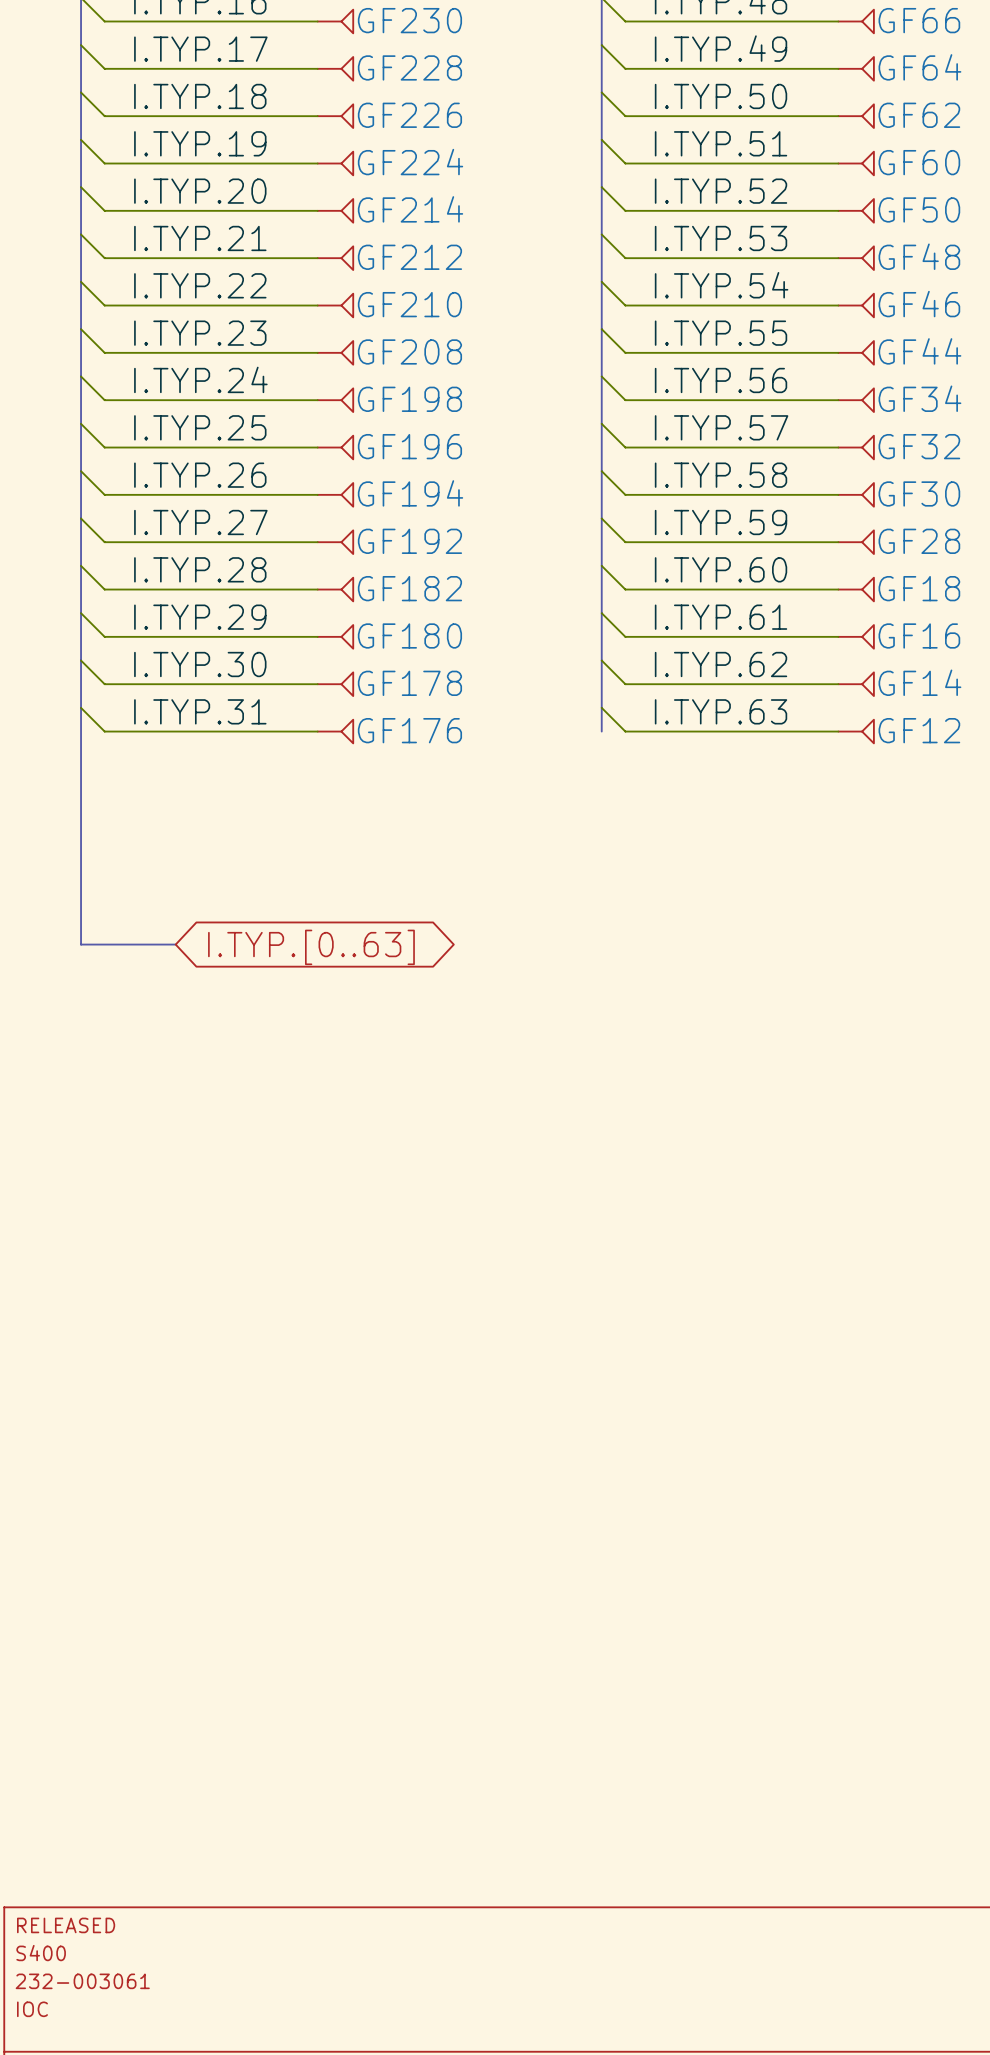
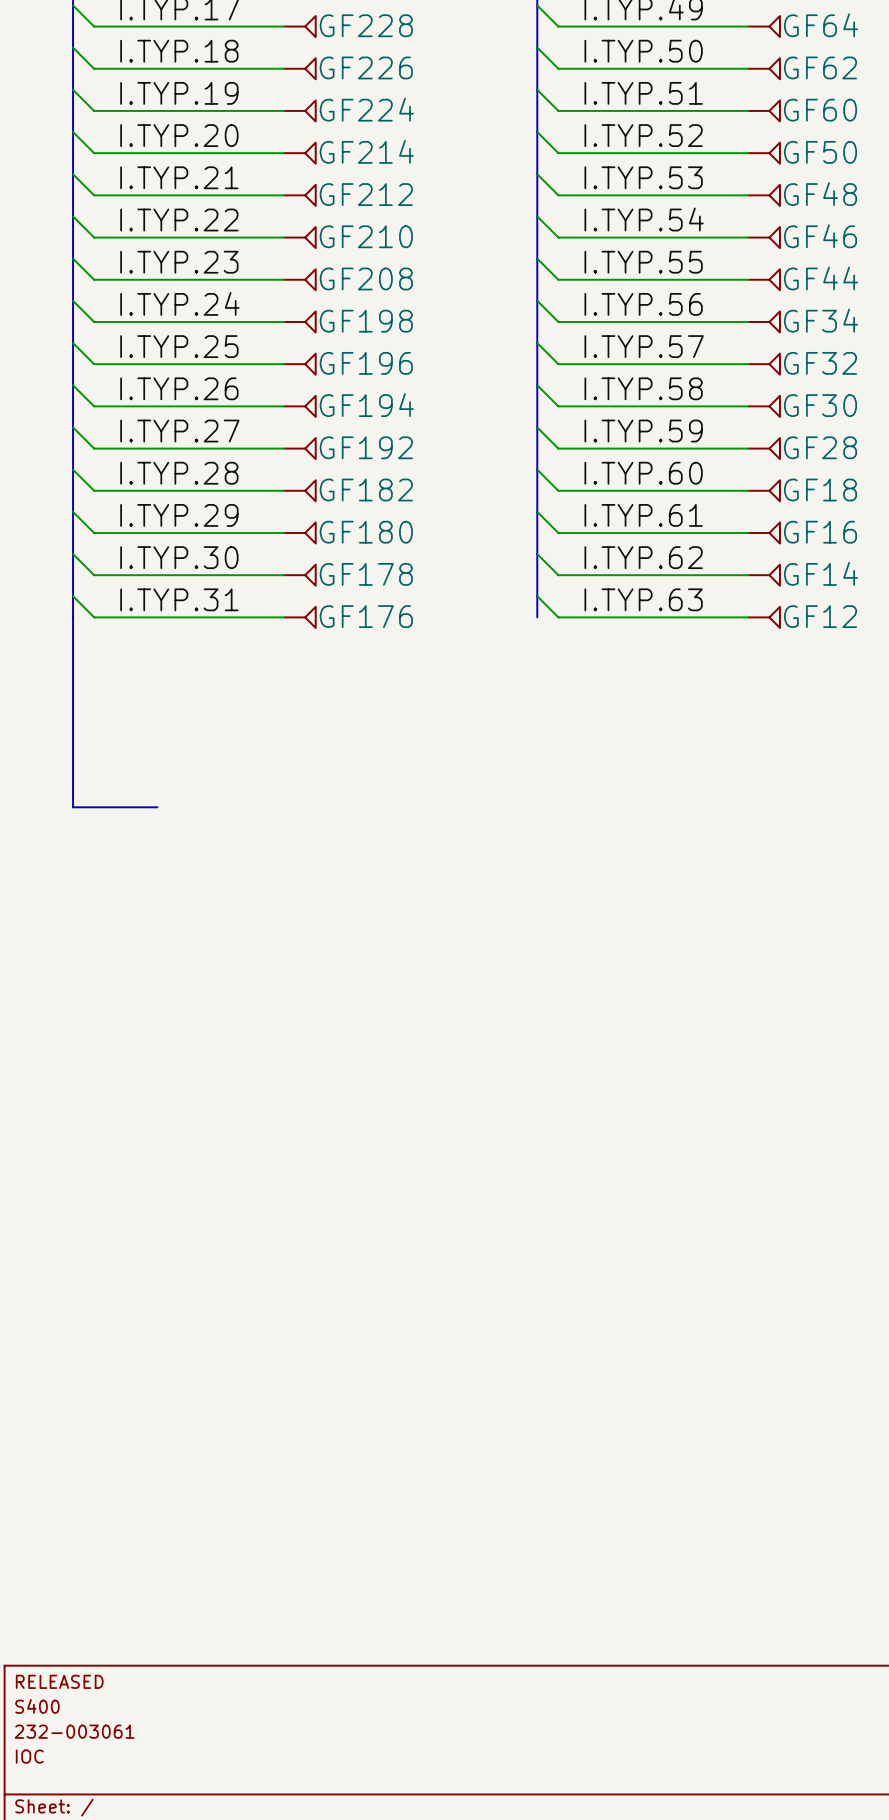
global label: I.TYP.[0..63] (311, 947) -> none

